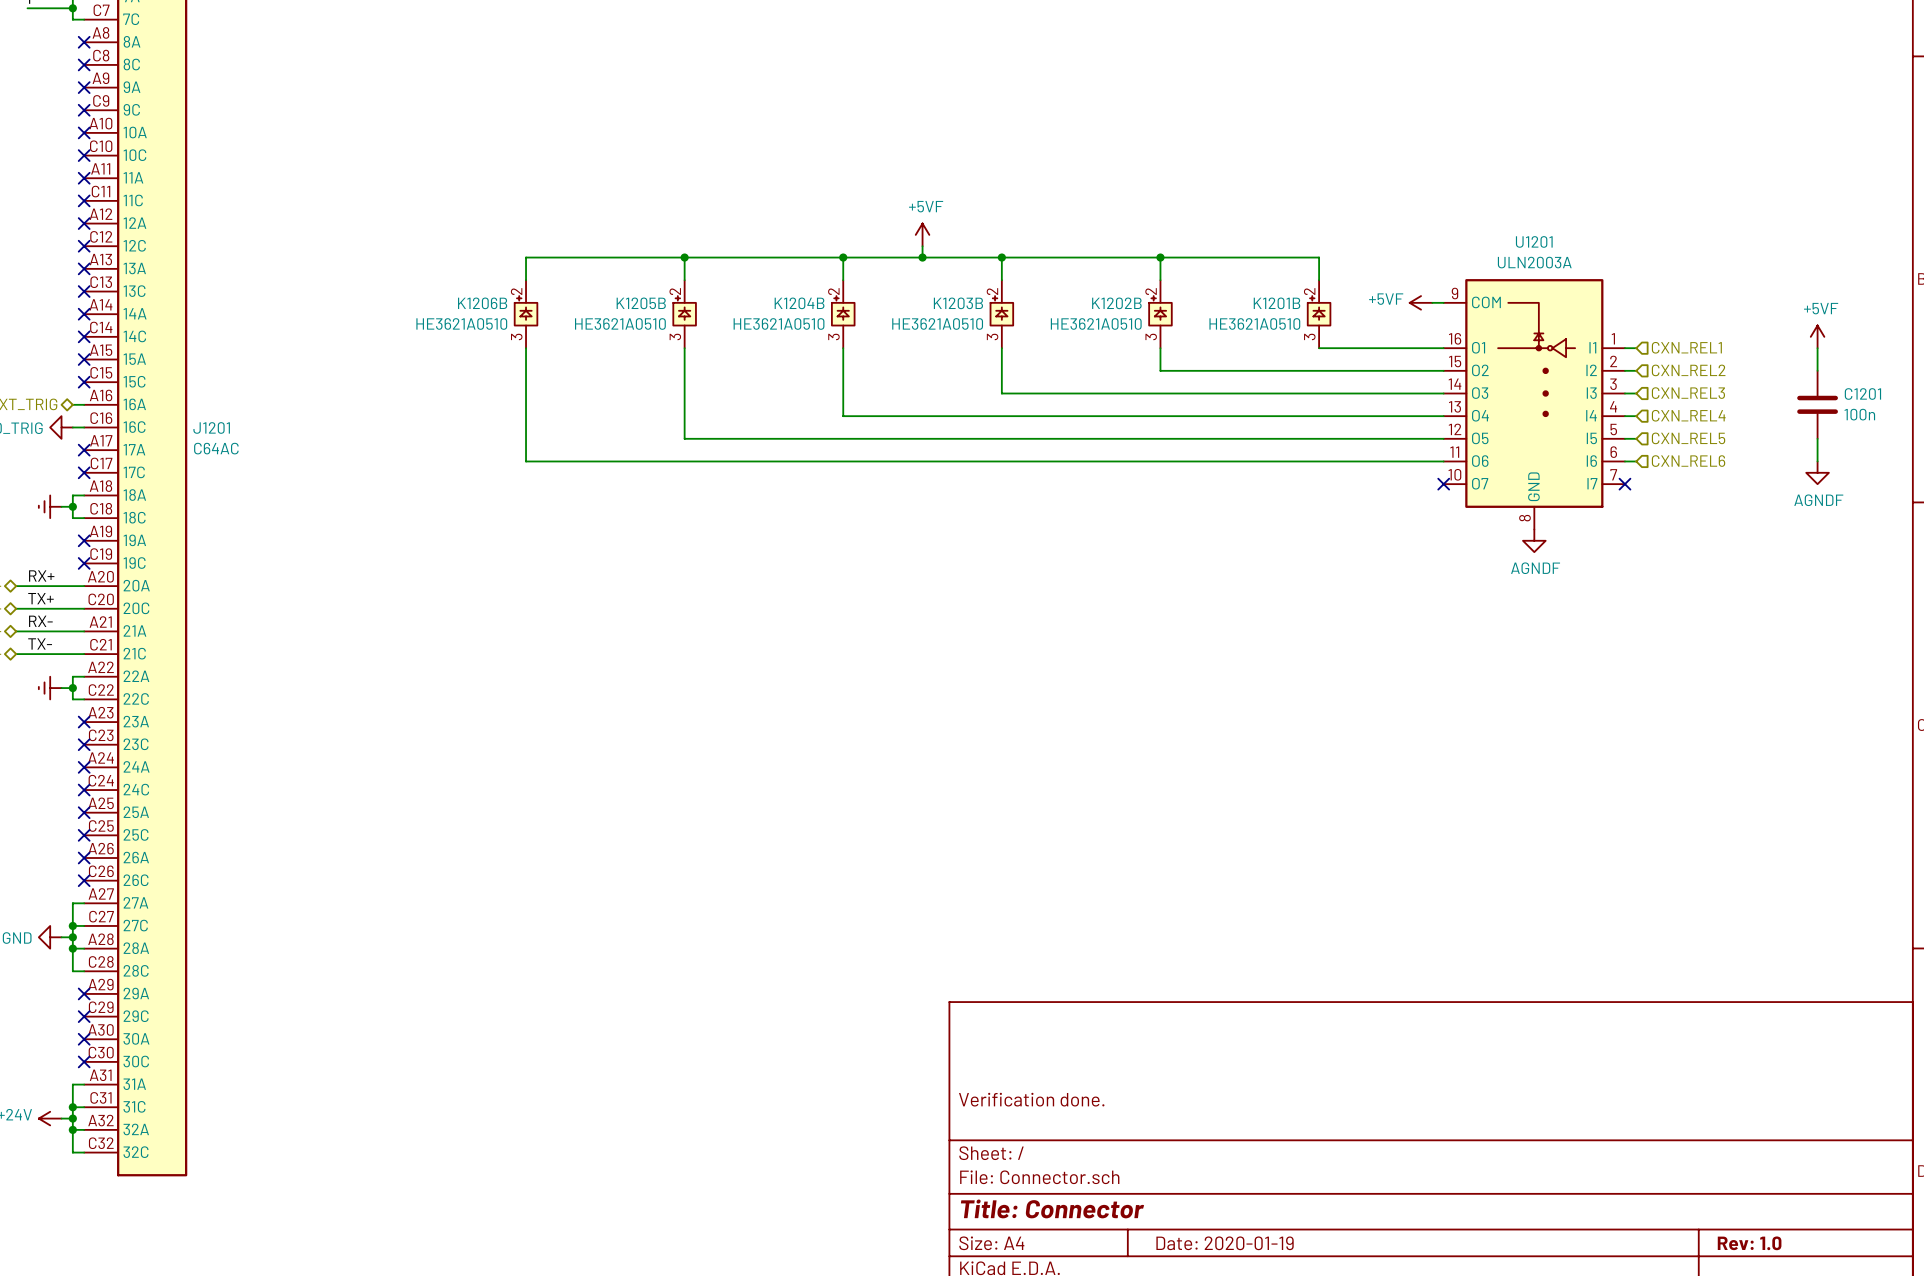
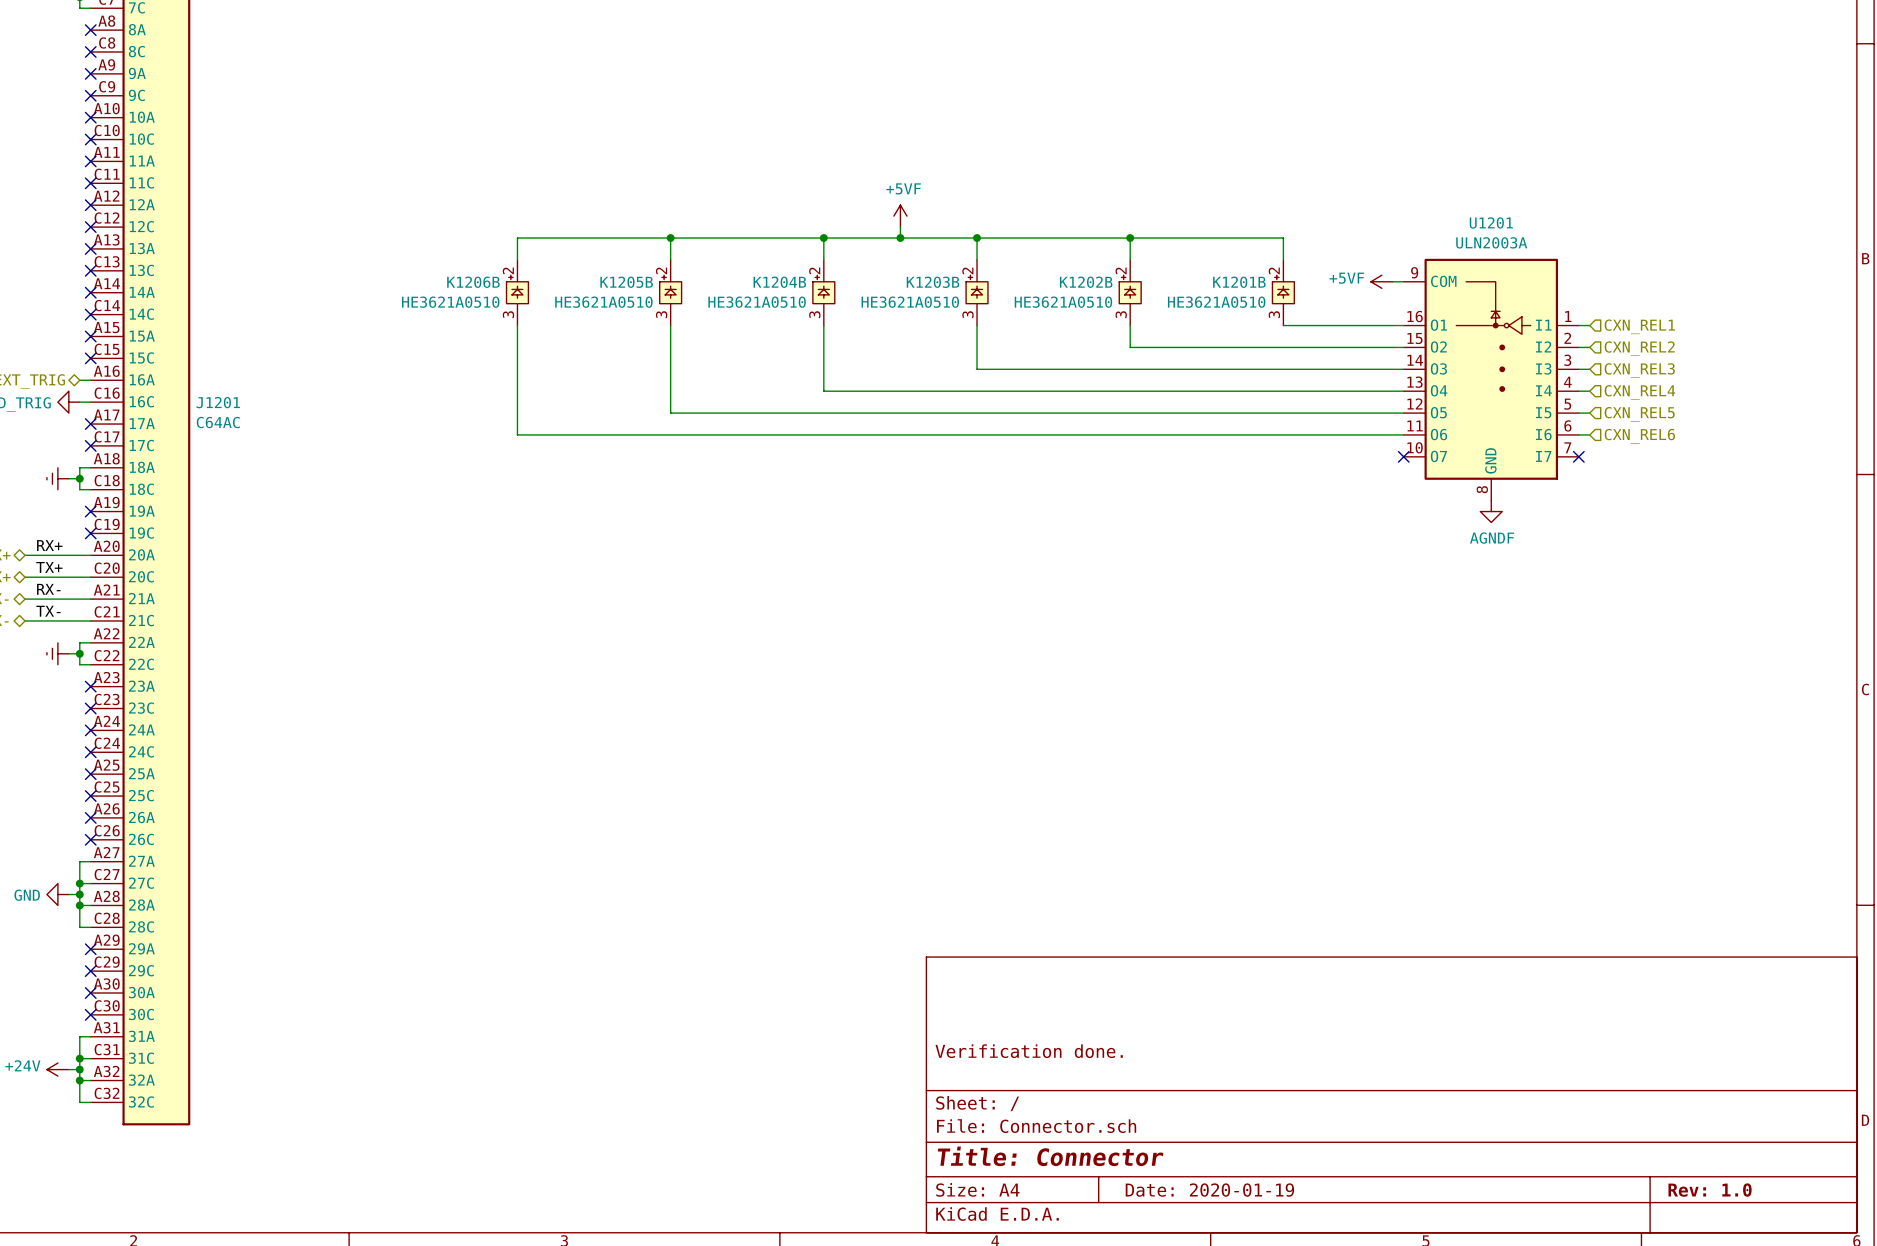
power symbol: +5VF (1817, 336) -> none
wire: (1817, 348) (1817, 370) -> none
C1201: 100n (1817, 404) -> none
wire: (1817, 438) (1817, 461) -> none
power symbol: AGNDF (1817, 472) -> none

